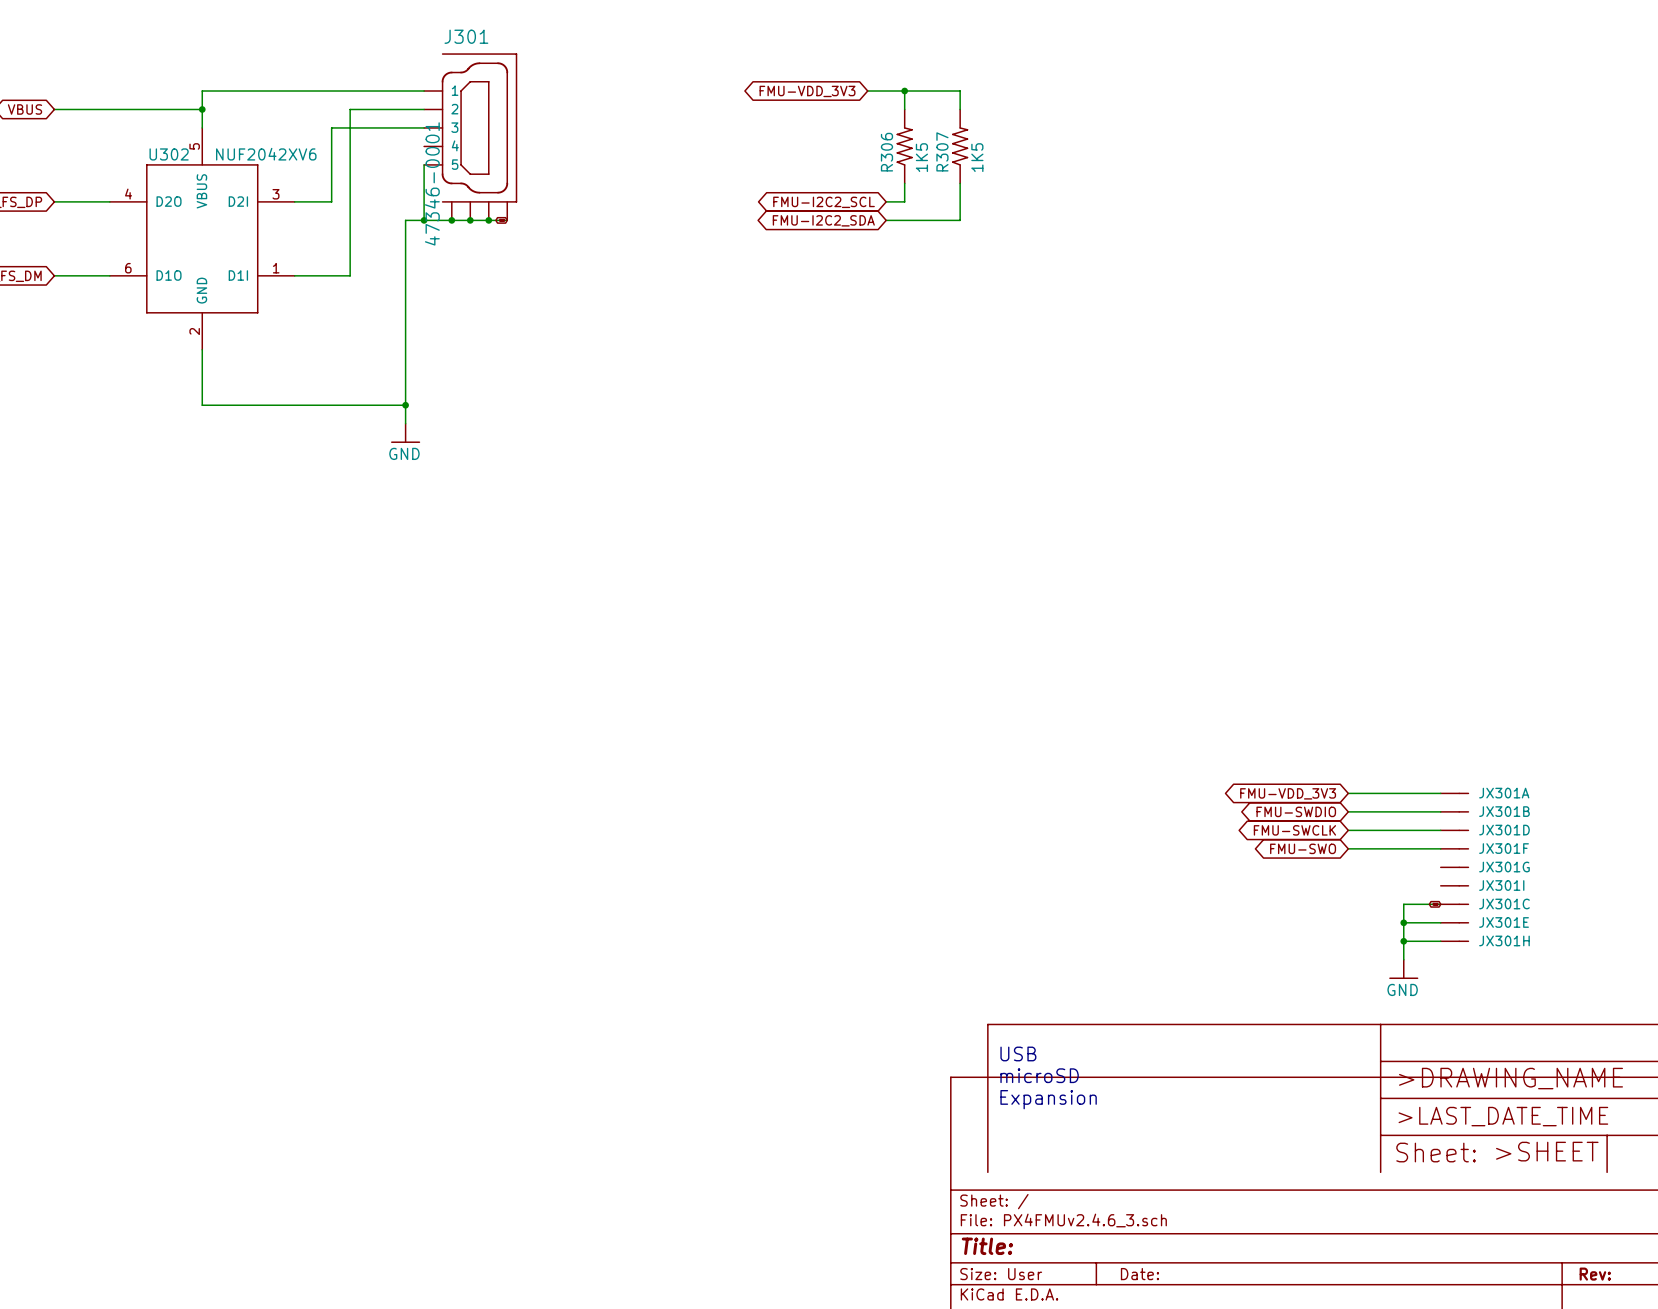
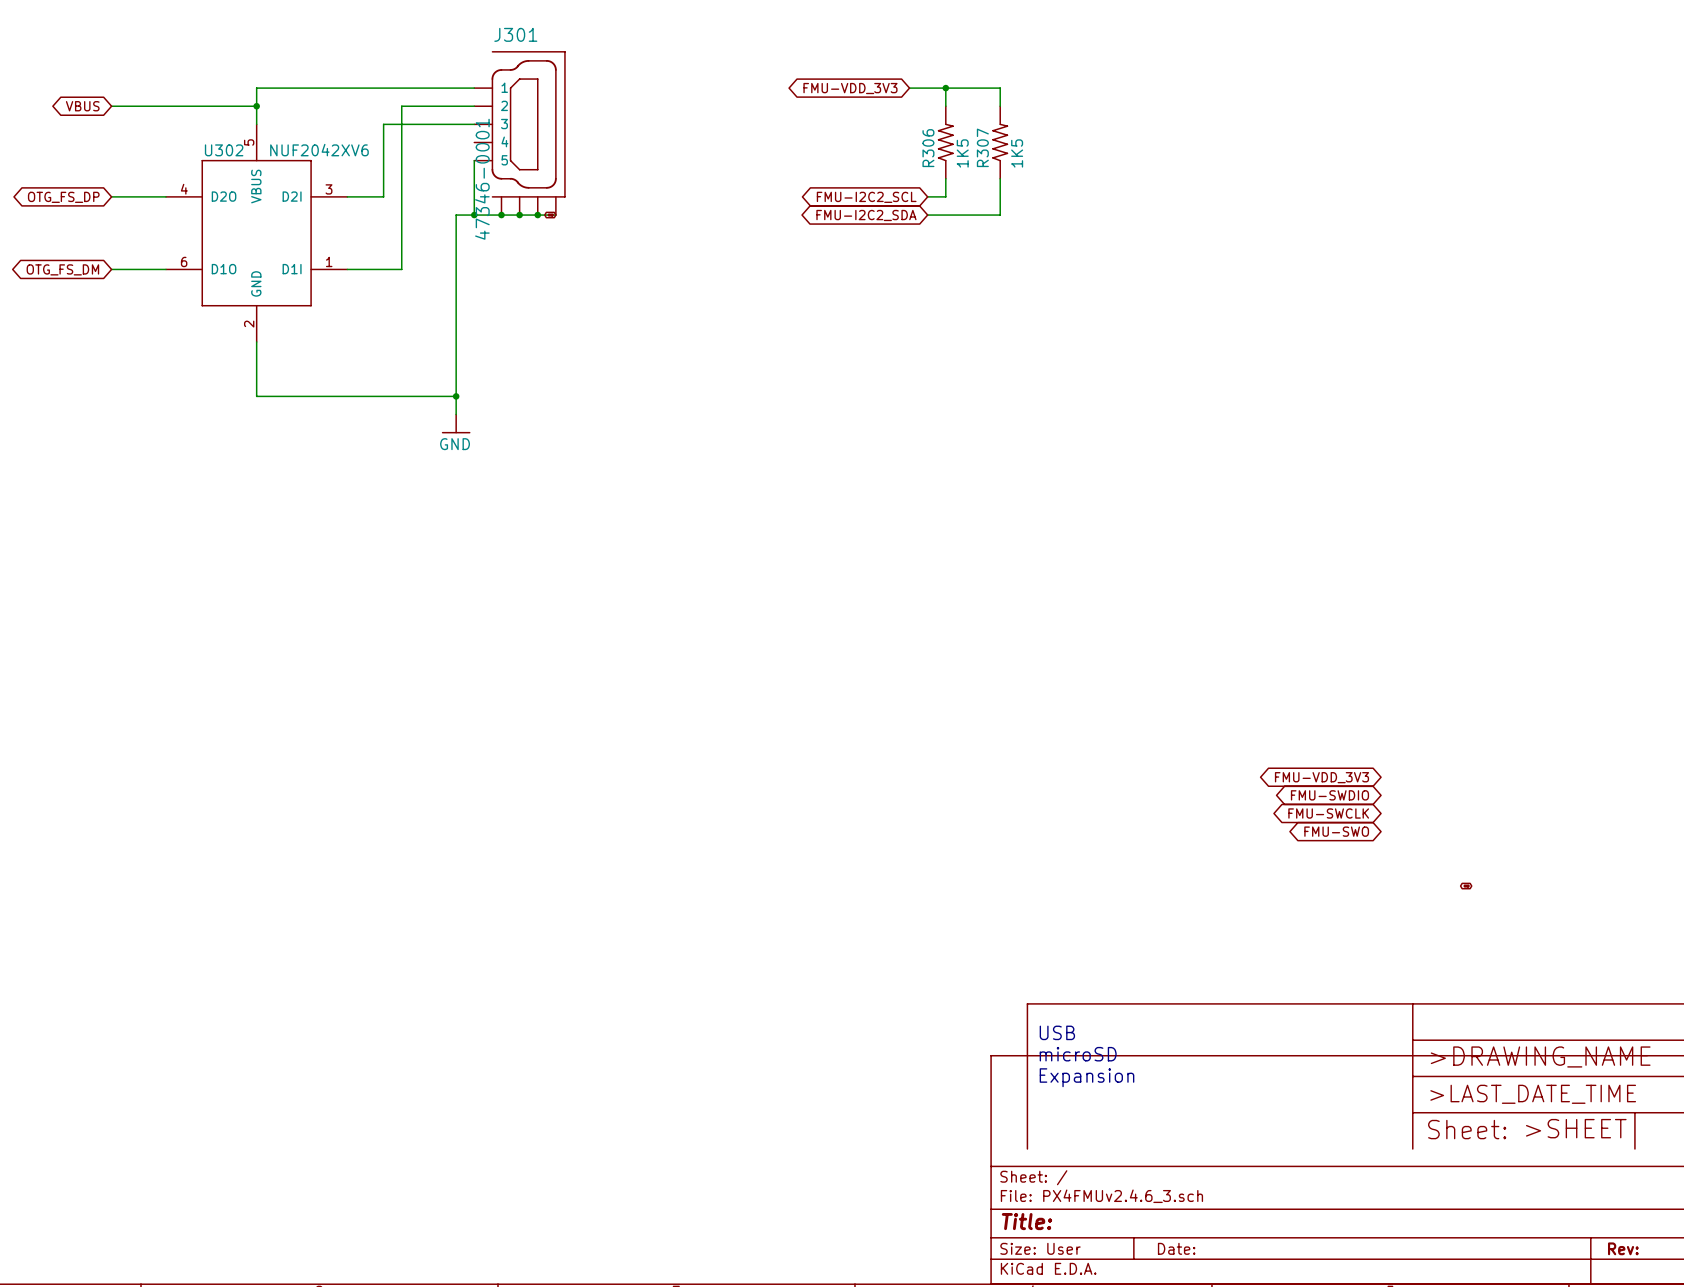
wire: (1348, 793) (1440, 793) -> none
JX301A: (1454, 793) -> none
wire: (1348, 811) (1440, 811) -> none
JX301B: (1454, 811) -> none
wire: (1348, 830) (1440, 830) -> none
JX301D: (1454, 830) -> none
wire: (1348, 848) (1440, 848) -> none
JX301F: (1454, 848) -> none
JX301G: (1454, 867) -> none
JX301I: (1454, 885) -> none
wire: (1440, 904) (1403, 904) (1403, 959) -> none
JX301C: (1454, 904) -> none
wire: (1403, 922) (1440, 922) -> none
junction: (1403, 922) -> none
JX301E: (1454, 922) -> none
wire: (1403, 941) (1440, 941) -> none
junction: (1403, 941) -> none
JX301H: (1454, 941) -> none
power symbol: GND (1403, 969) -> none

